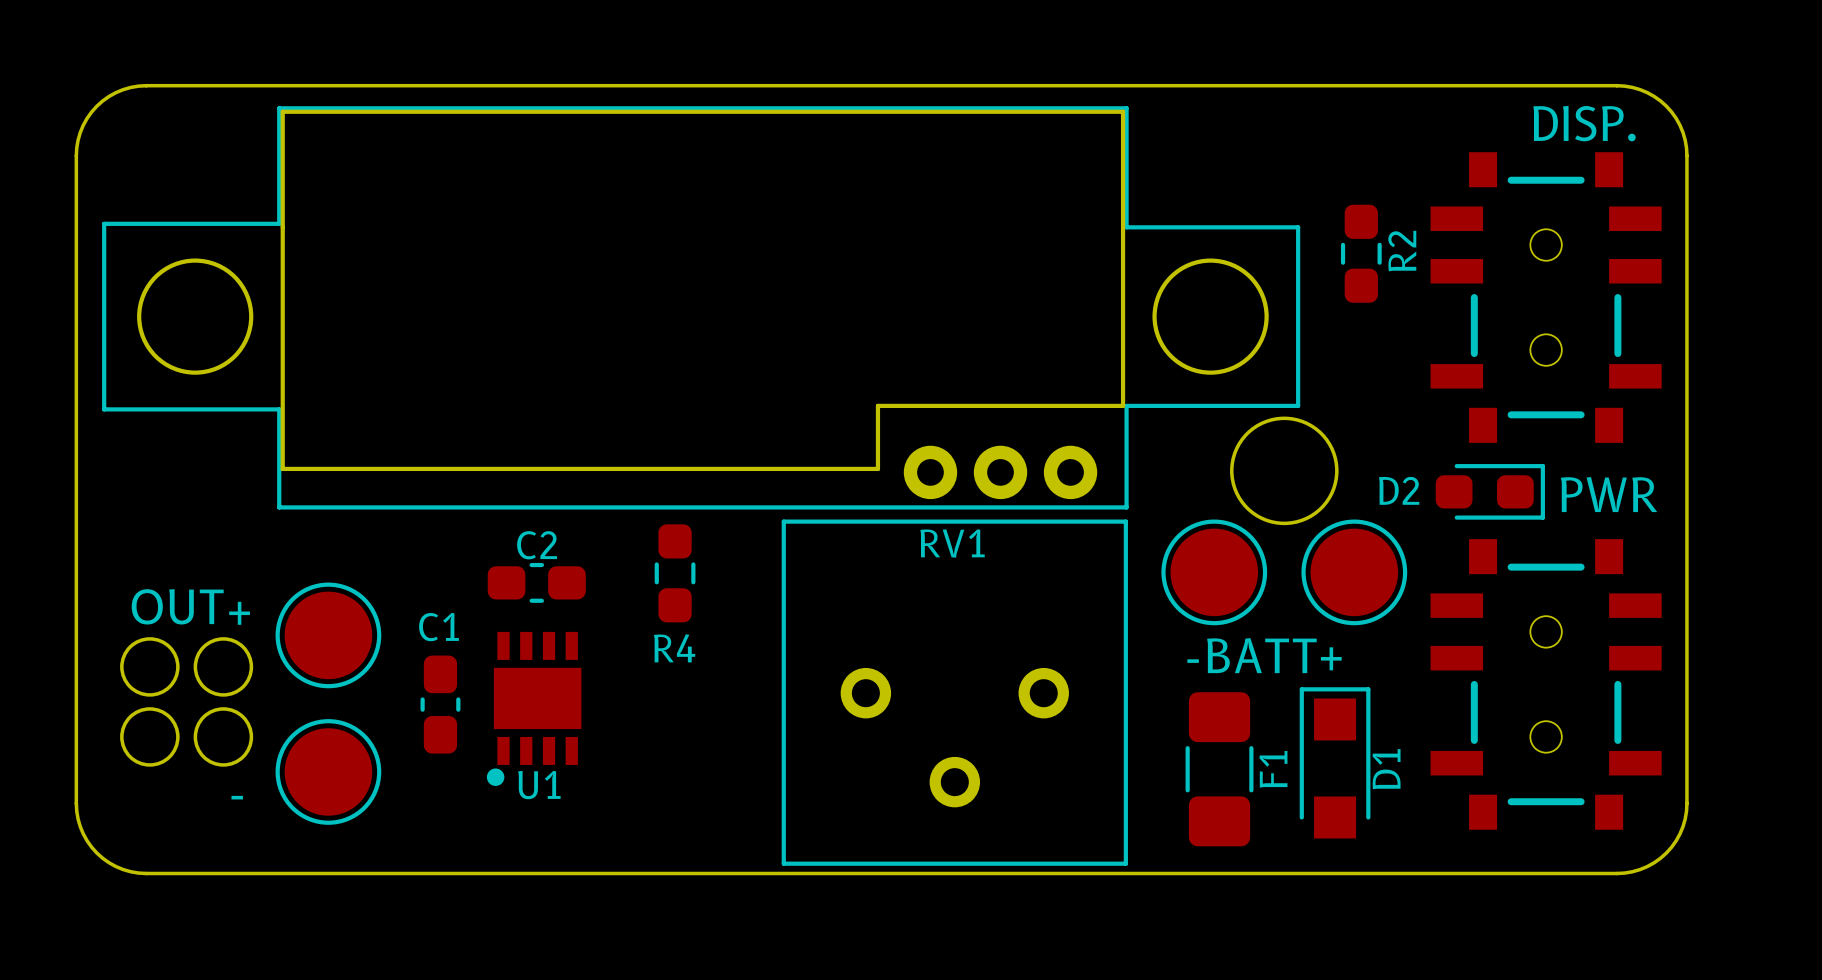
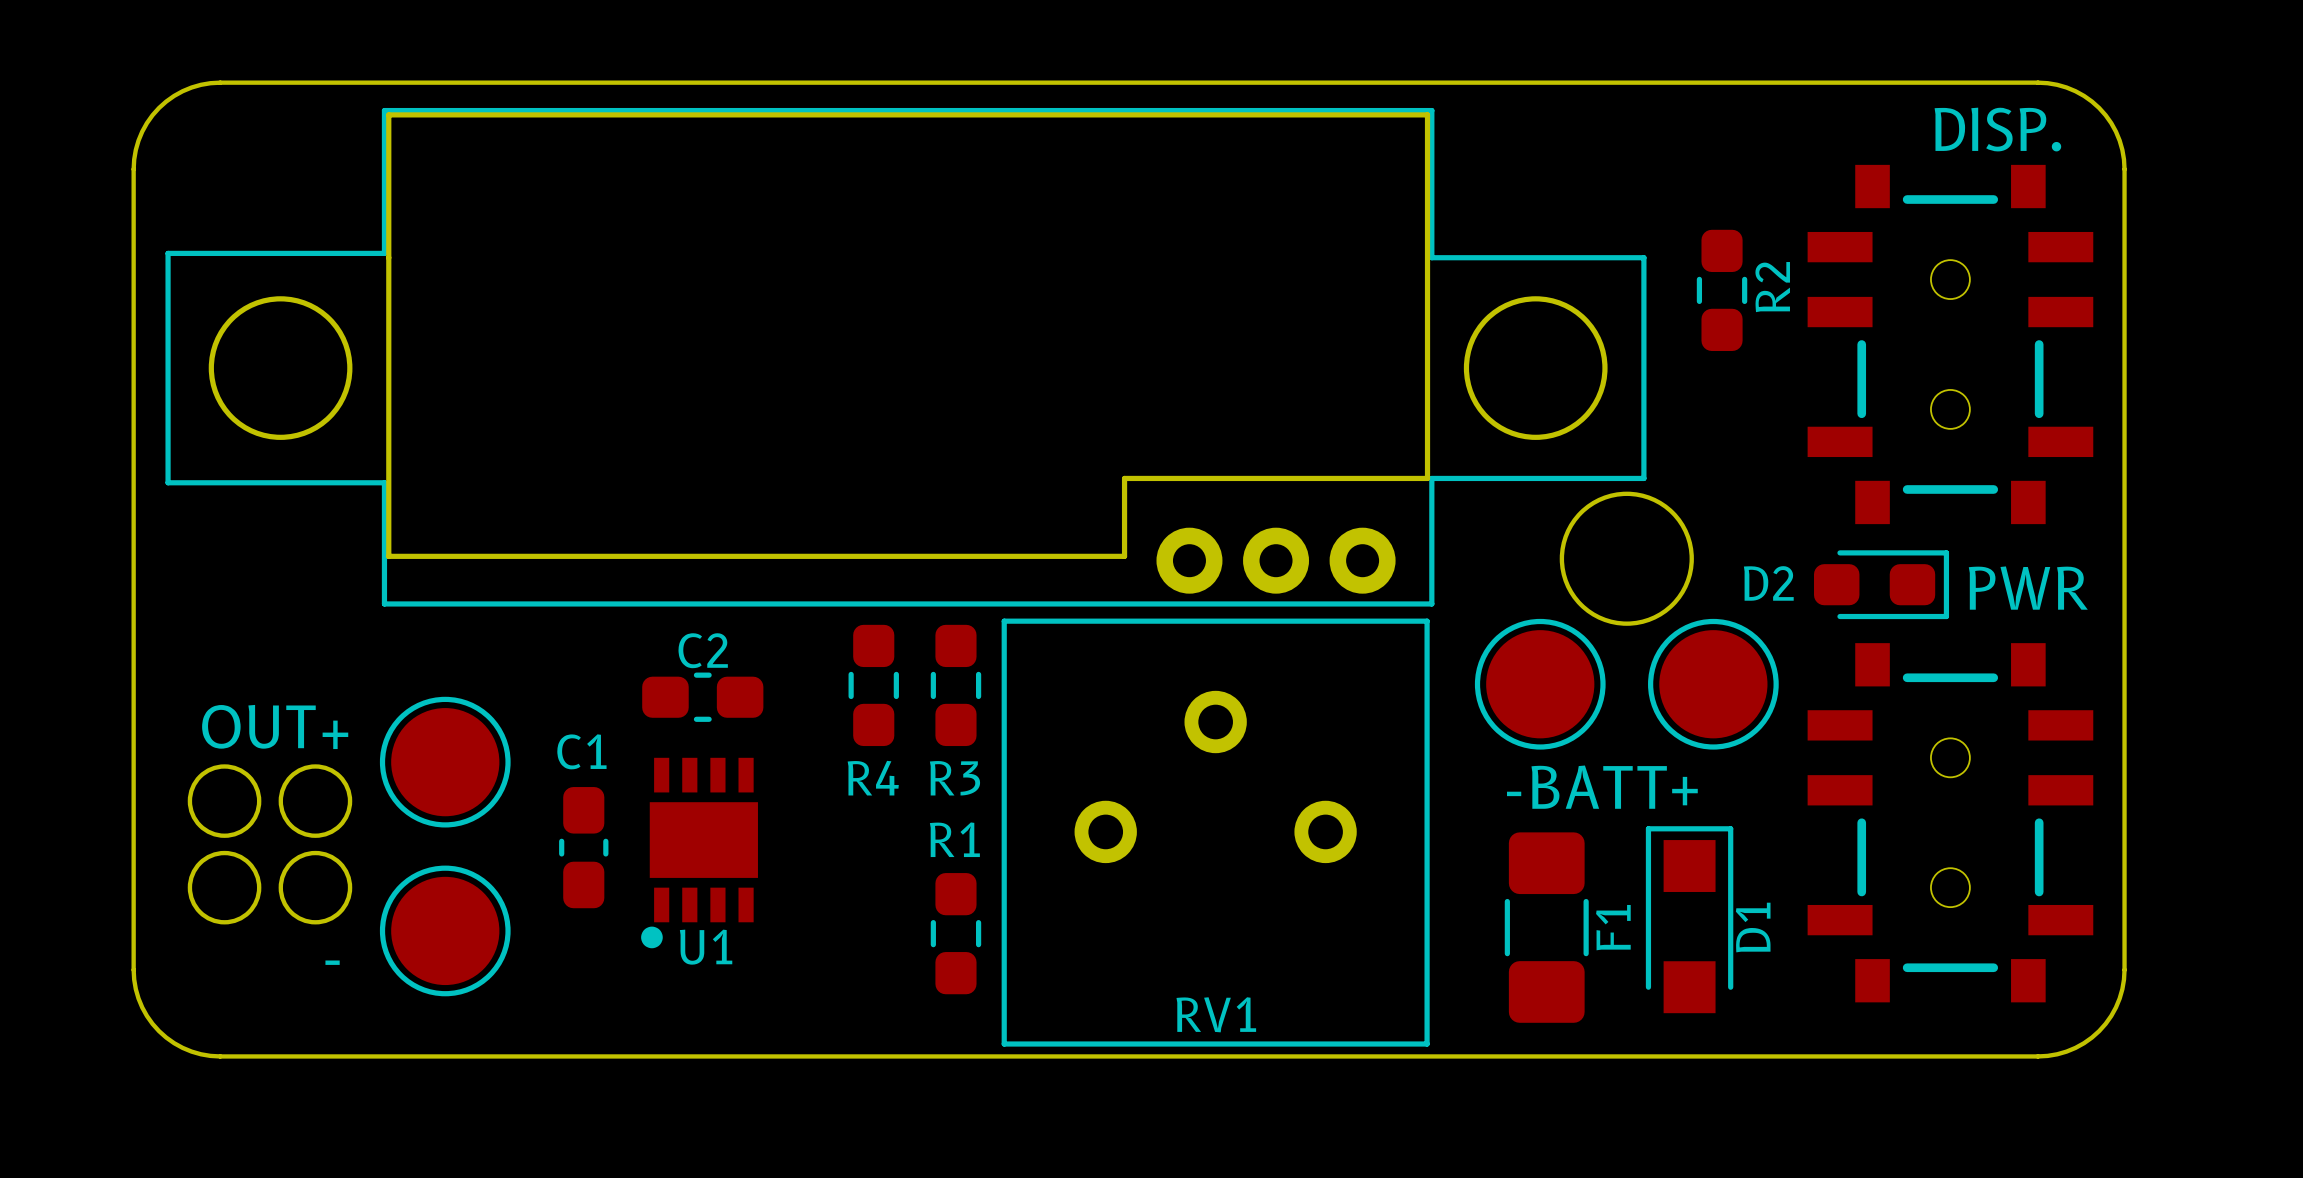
R3: none -> (955, 685)
RV1 rotation: 0° (954, 692) -> 180° (1215, 832)
R1: none -> (955, 933)

